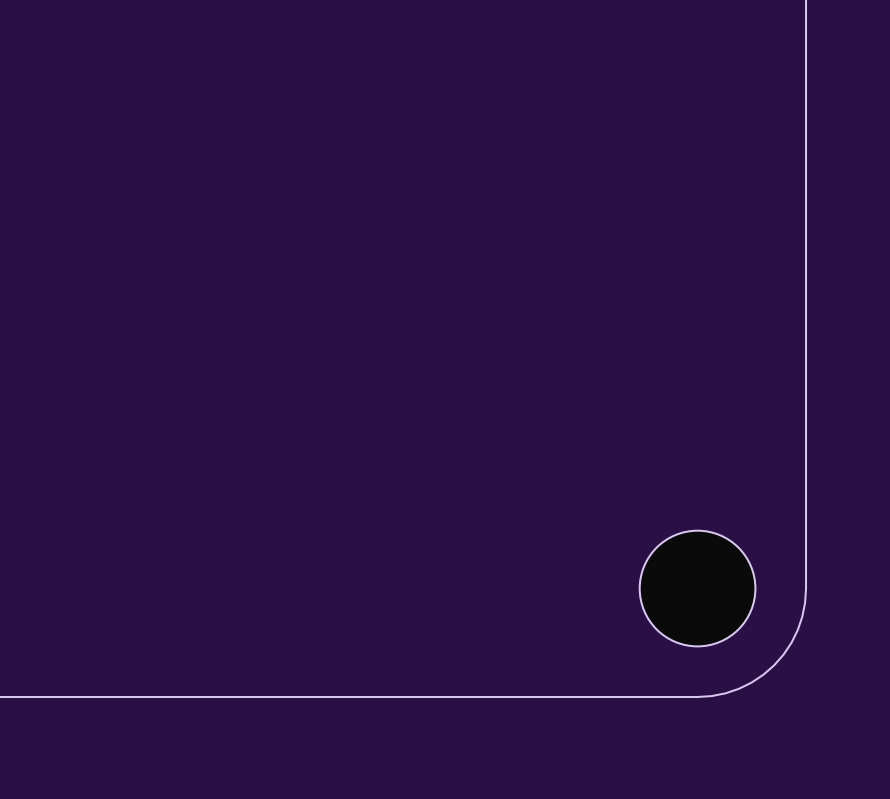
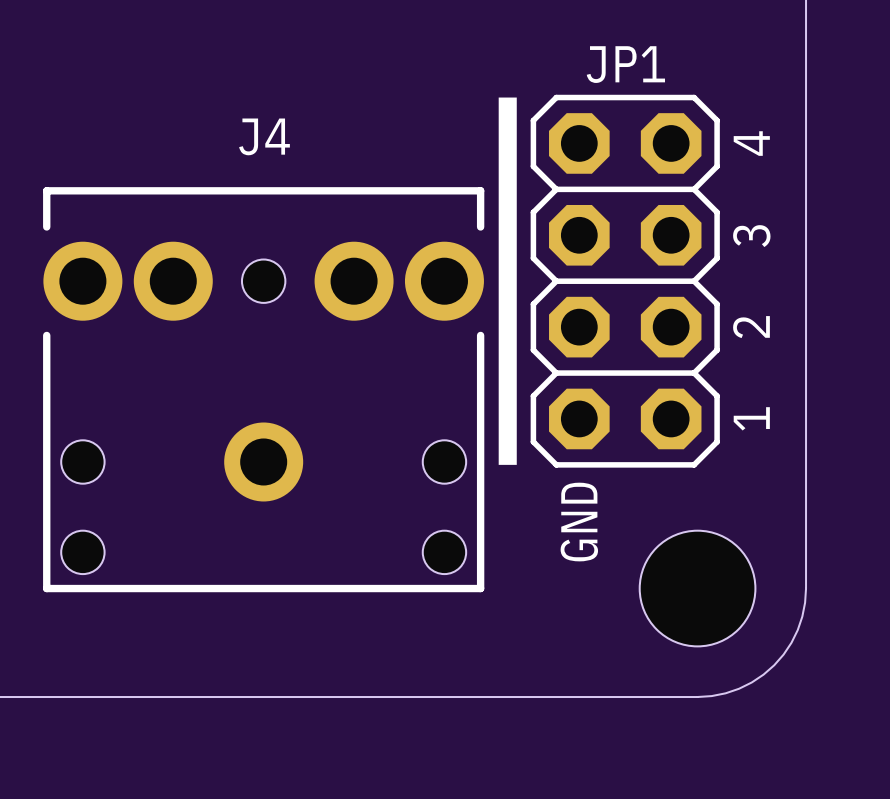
drawing: none -> [498, 97, 517, 465]
text: none -> 4 (751, 143)
text: none -> 3 (751, 236)
JP1: none -> (625, 281)
text: none -> 2 (751, 327)
J4: none -> (263, 389)
text: none -> 1 (751, 418)
text: none -> GND (579, 522)

